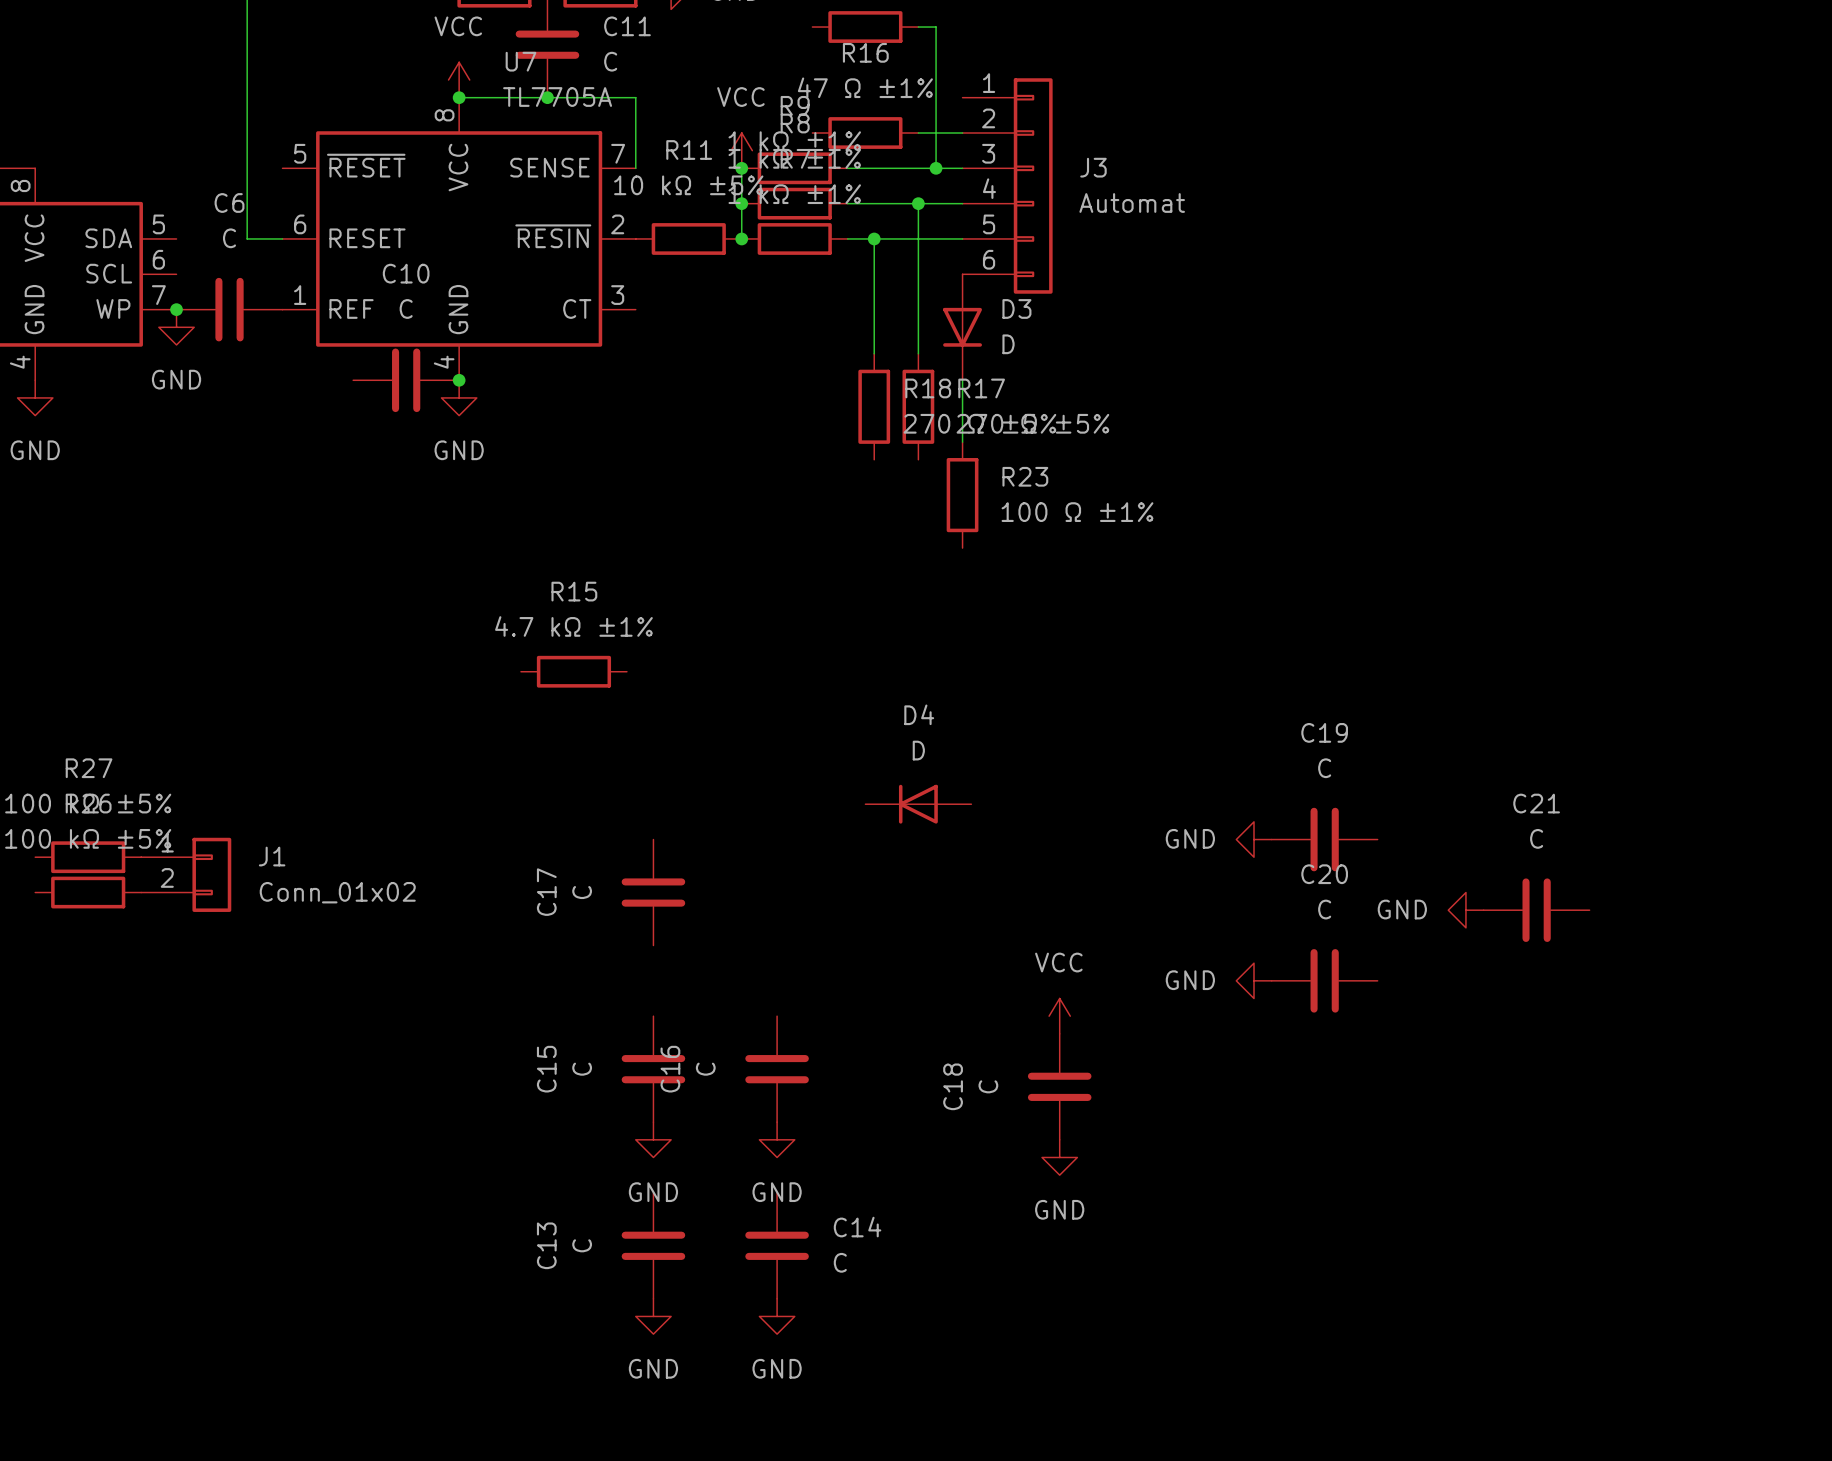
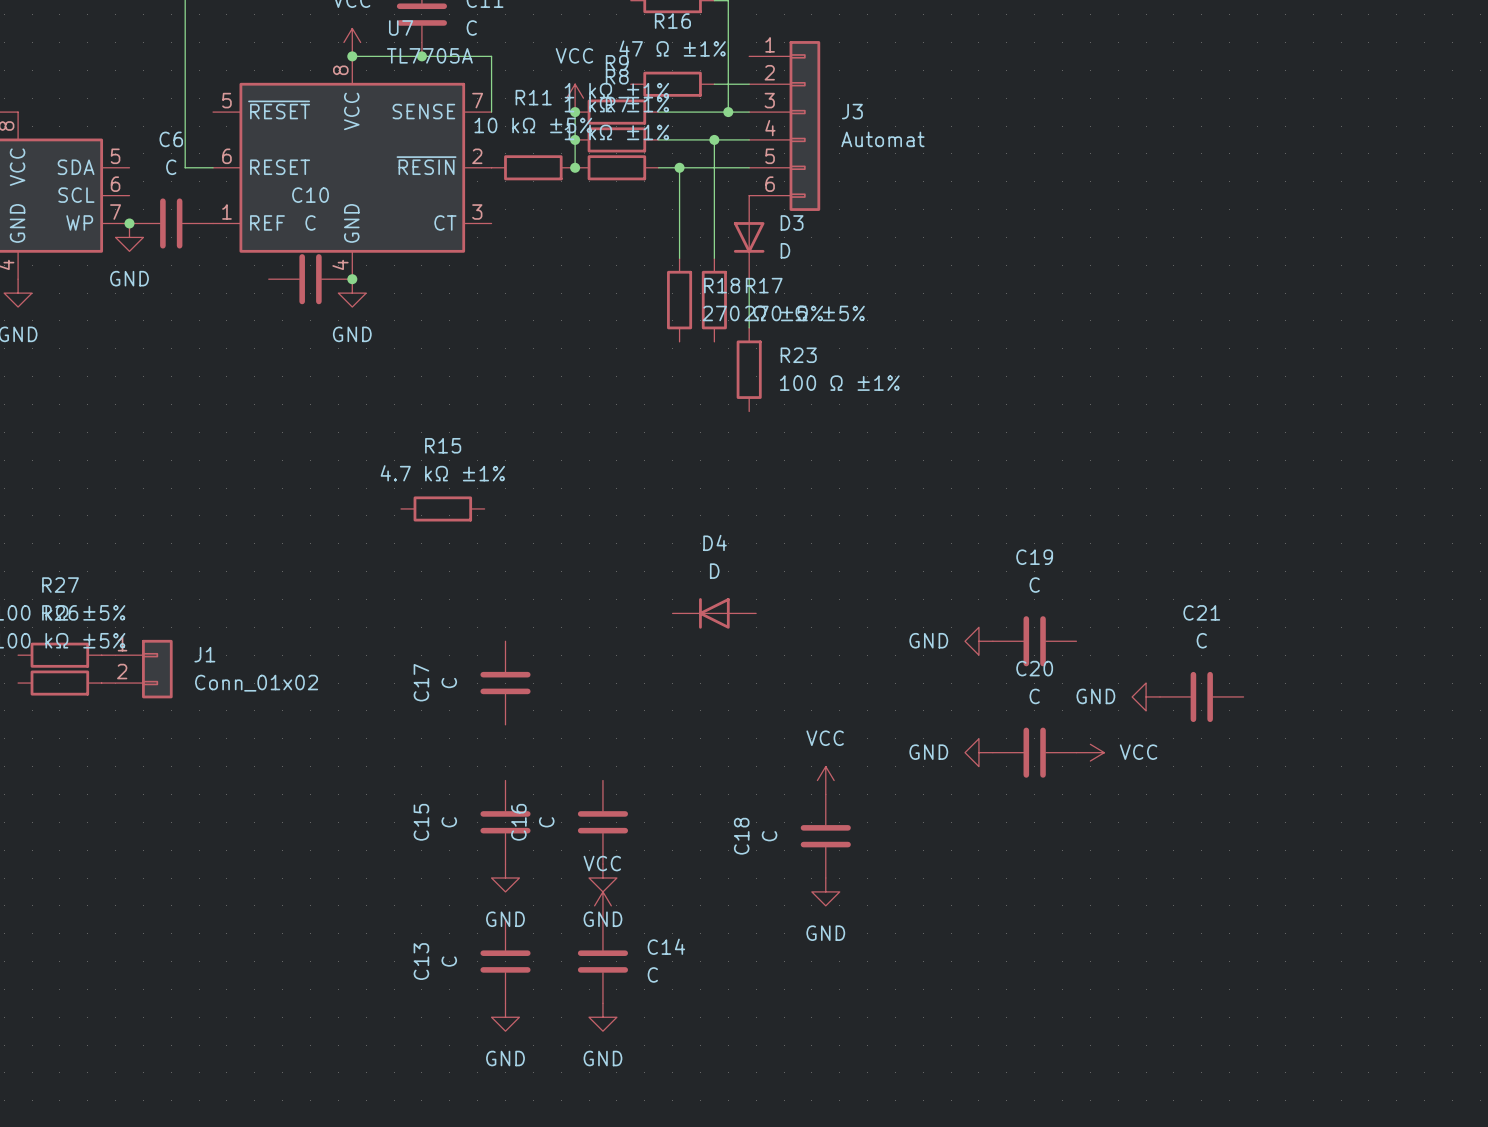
power symbol: none -> VCC (1090, 752)
power symbol: none -> VCC (602, 905)

